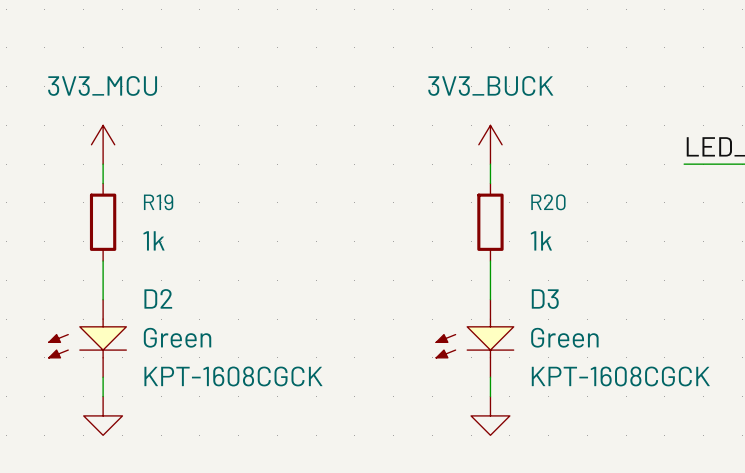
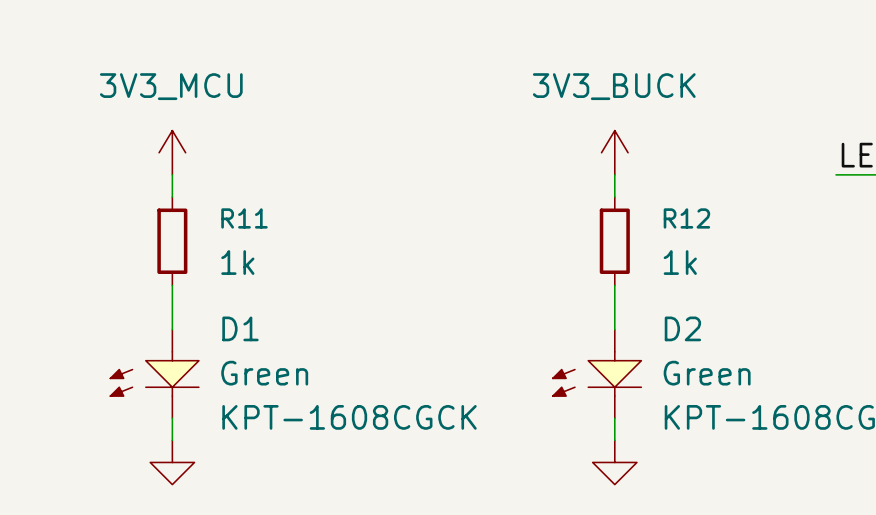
R19 name: R19 (158, 202) -> R11 (244, 218)
R20 name: R20 (548, 202) -> R12 (686, 218)
D2 name: D2 (158, 298) -> D1 (240, 328)
D3 name: D3 (545, 299) -> D2 (682, 328)

